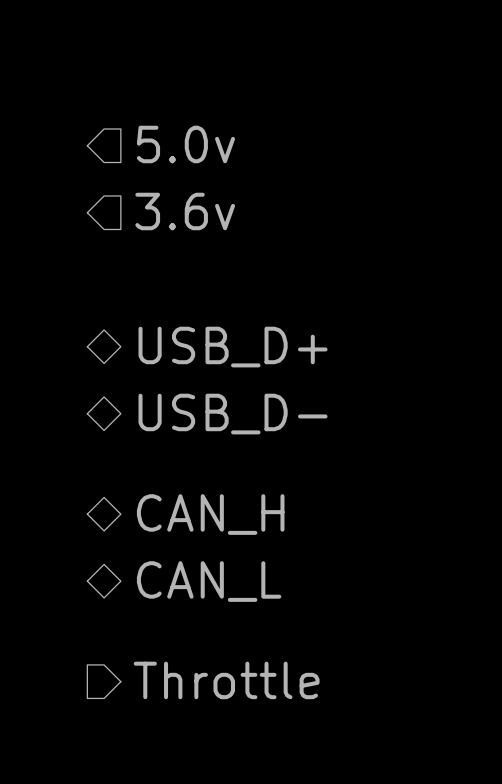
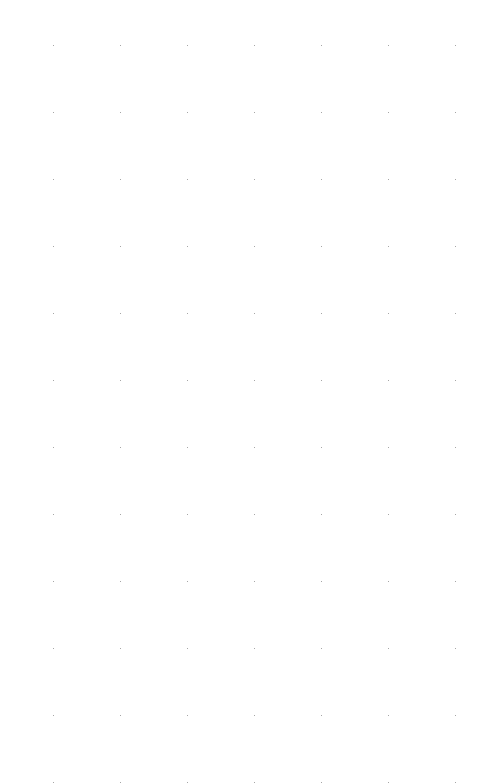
hierarchical label: 5.0v (185, 144) -> none
hierarchical label: 3.6v (185, 211) -> none
hierarchical label: USB_D+ (233, 347) -> none
hierarchical label: USB_D- (233, 414) -> none
hierarchical label: CAN_H (210, 514) -> none
hierarchical label: CAN_L (209, 581) -> none
hierarchical label: Throttle (226, 680) -> none

